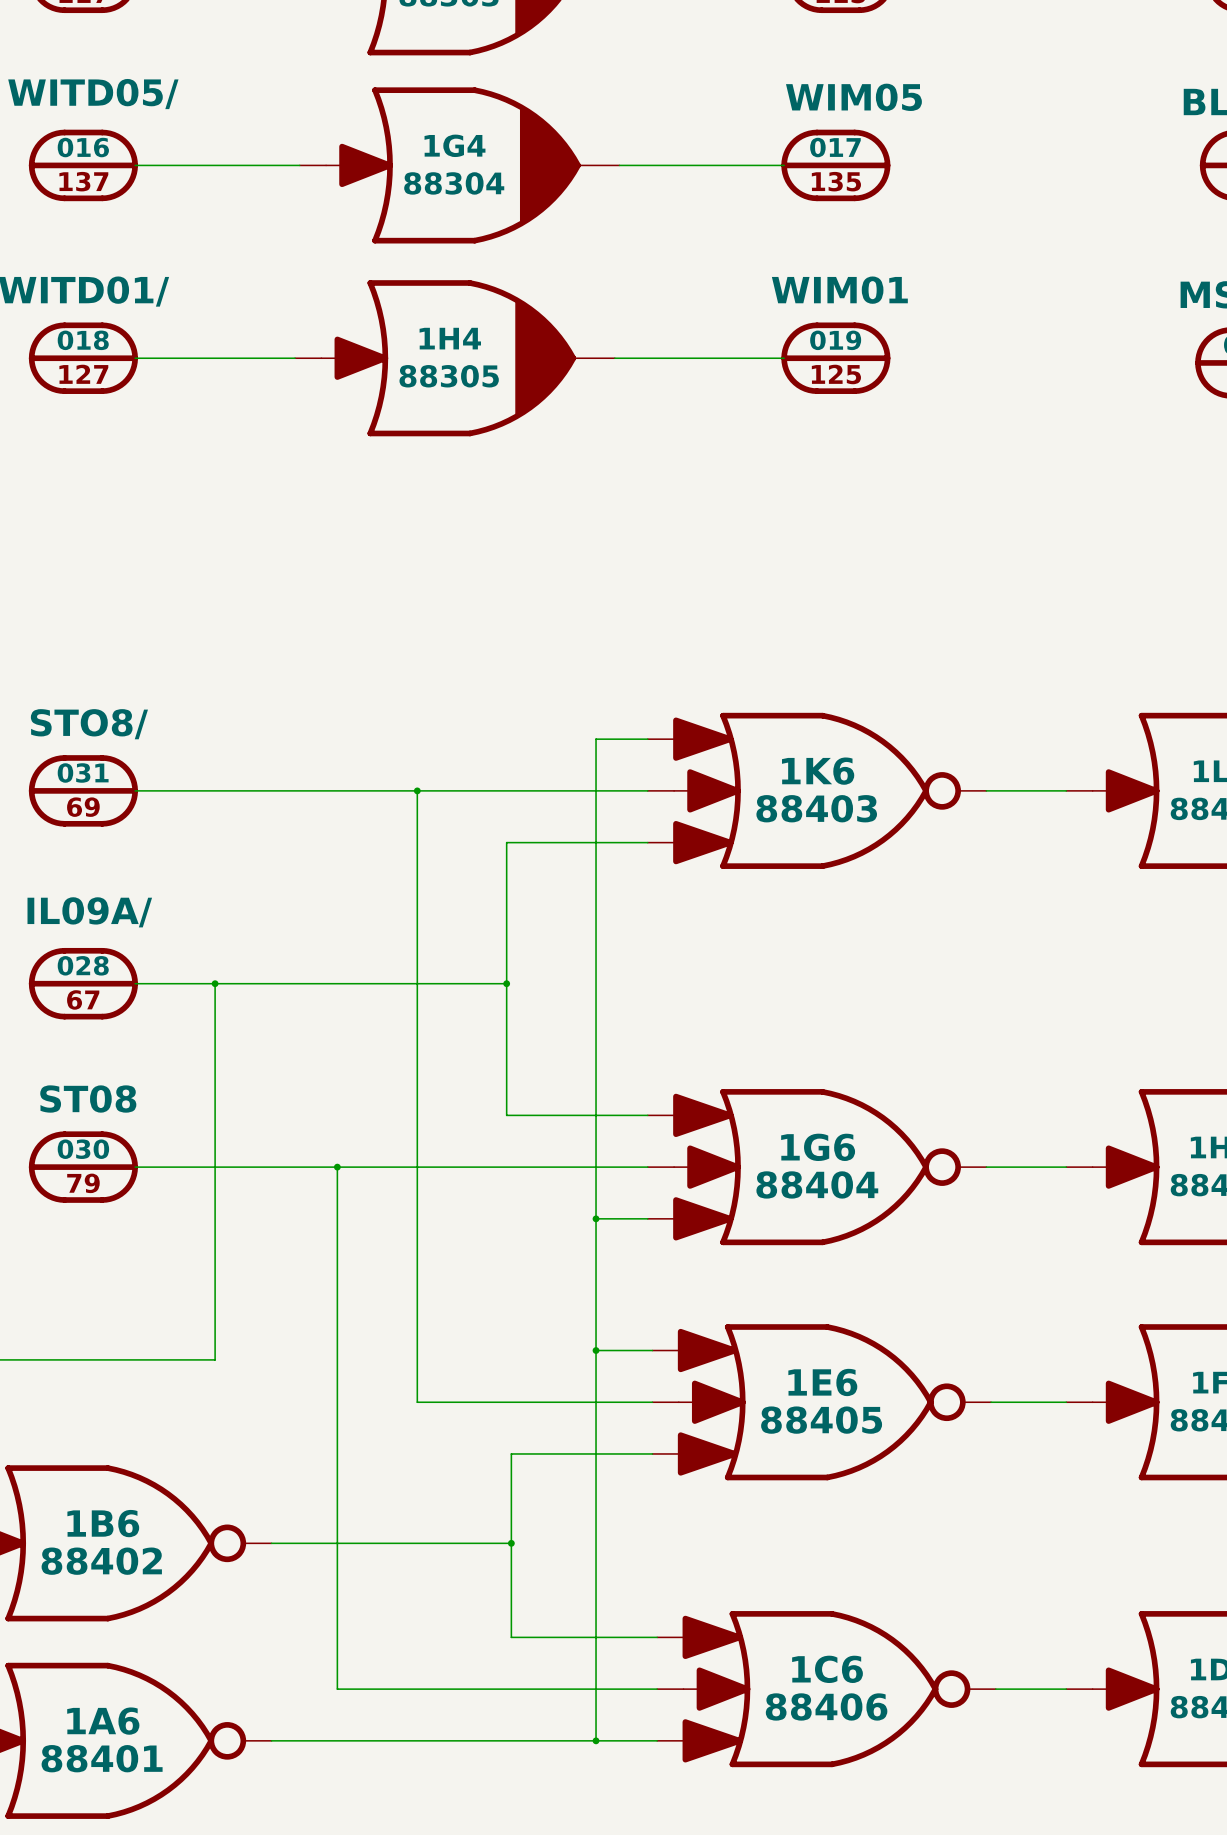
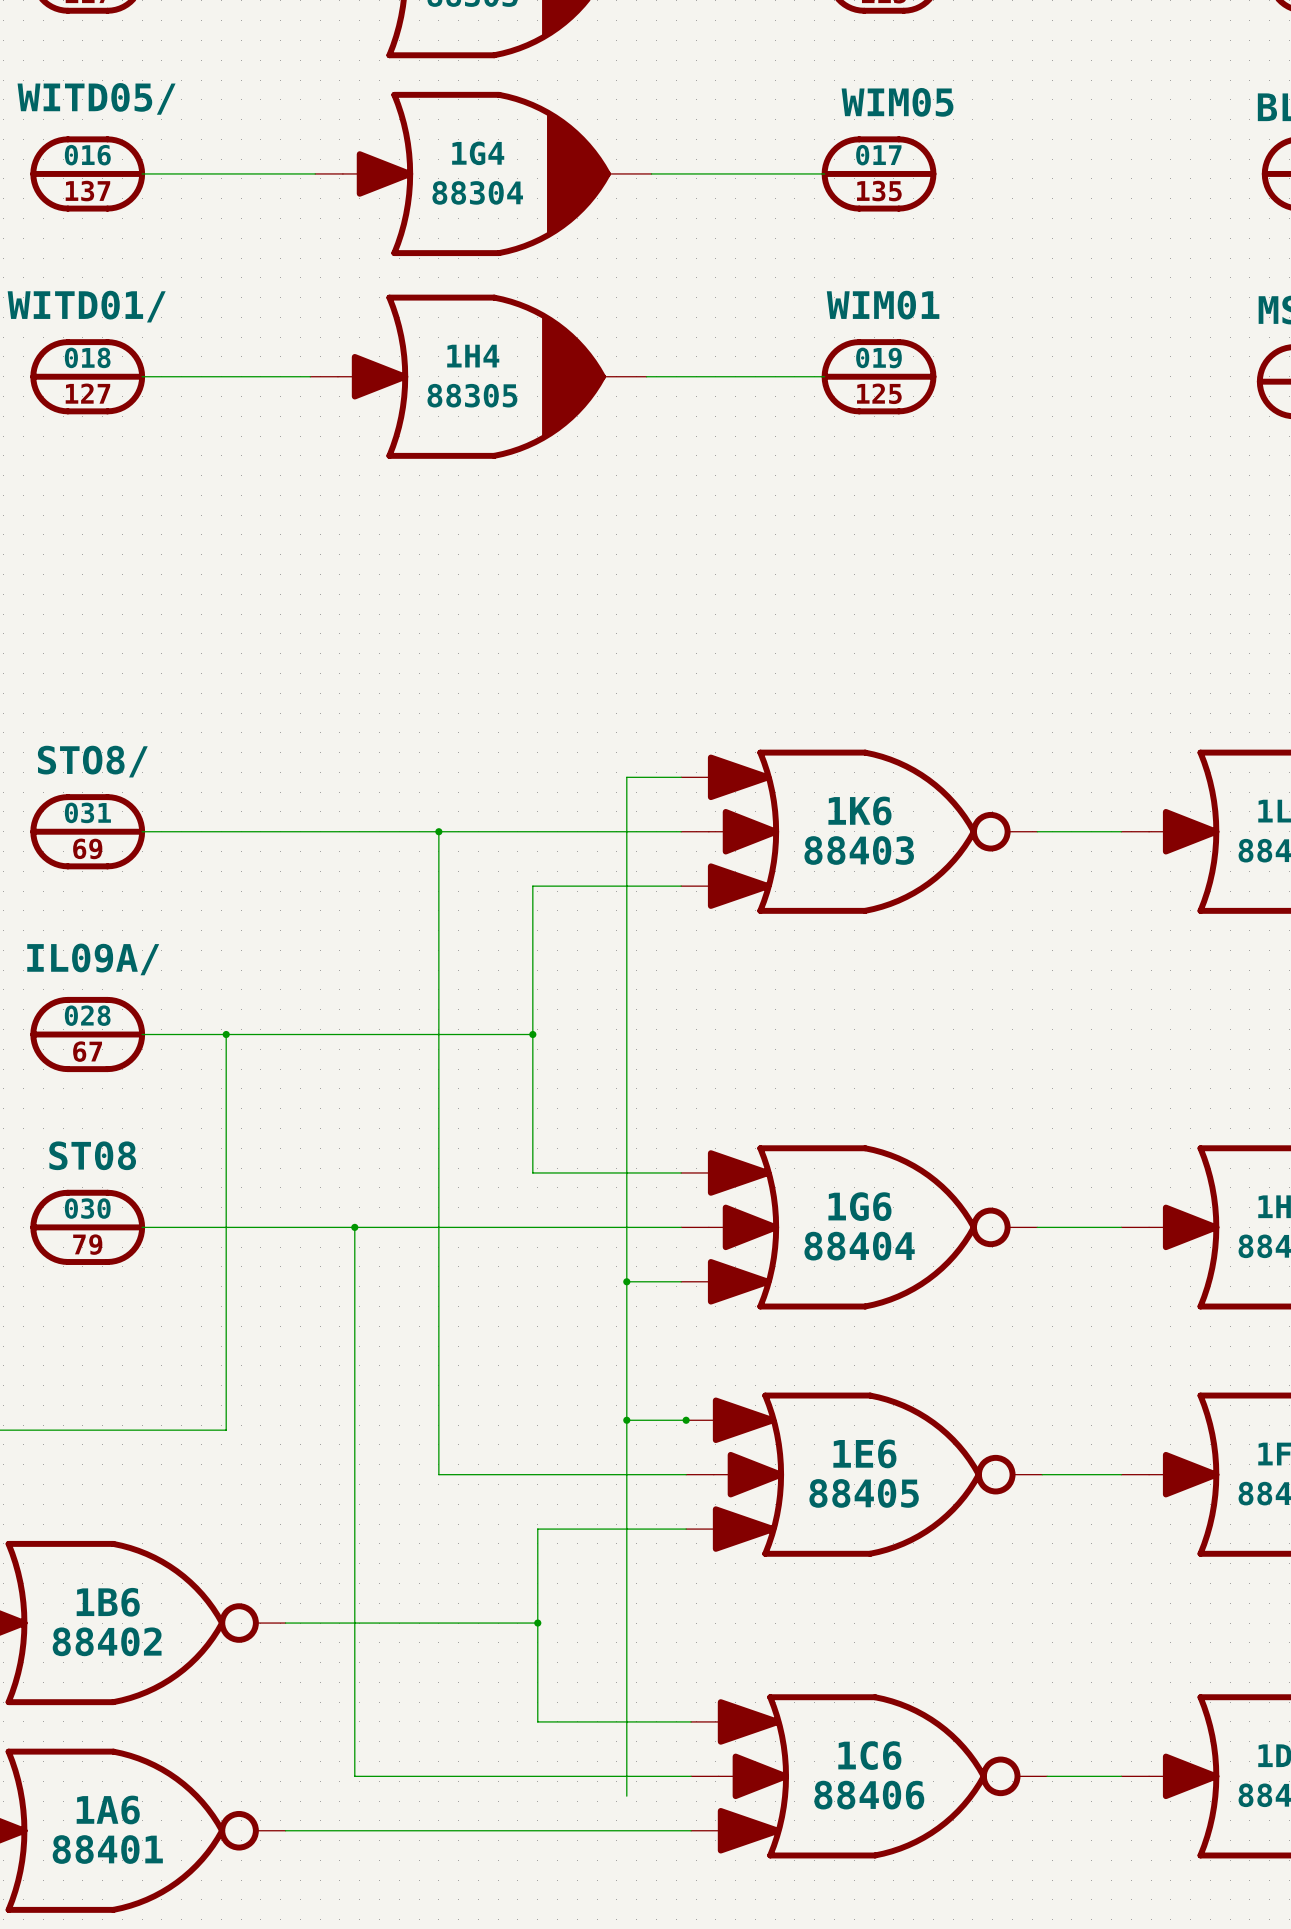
junction: none -> (686, 1420)
wire: (596, 1707) (596, 1740) -> none
junction: (596, 1740) -> none

